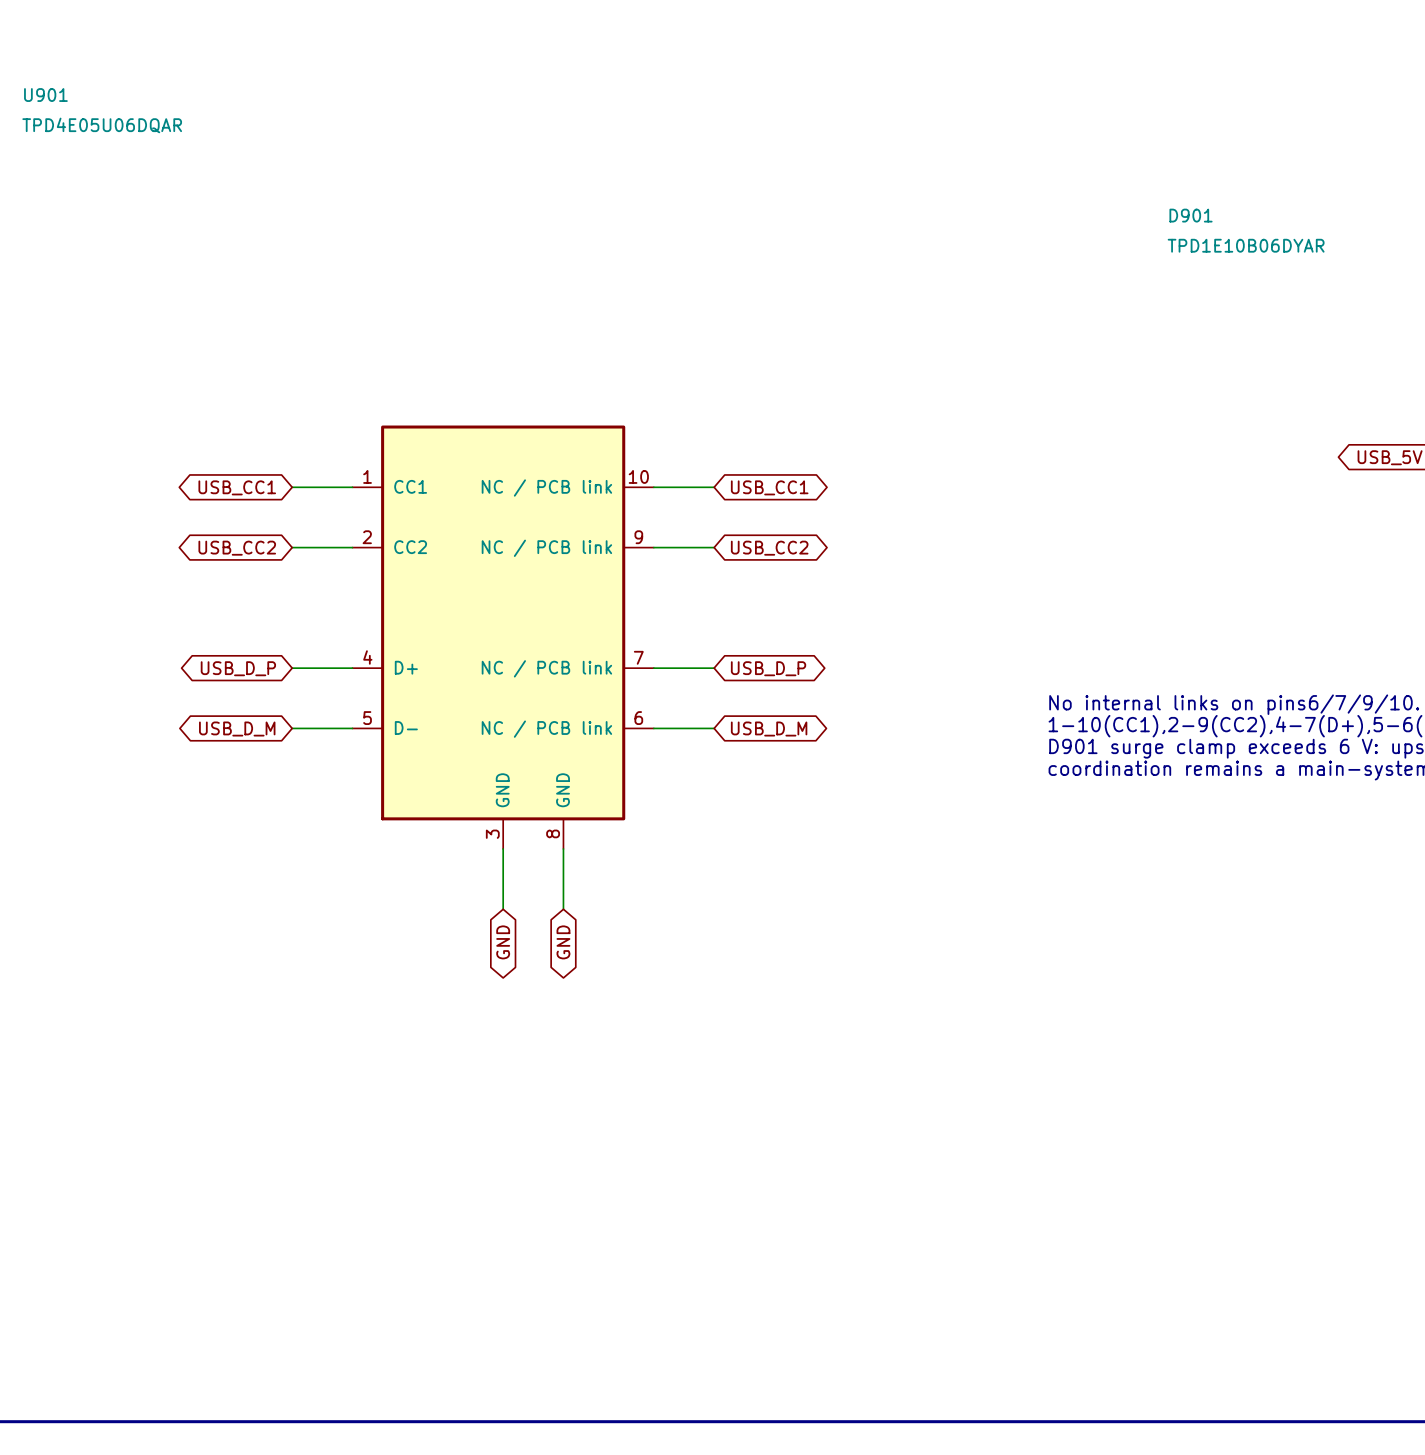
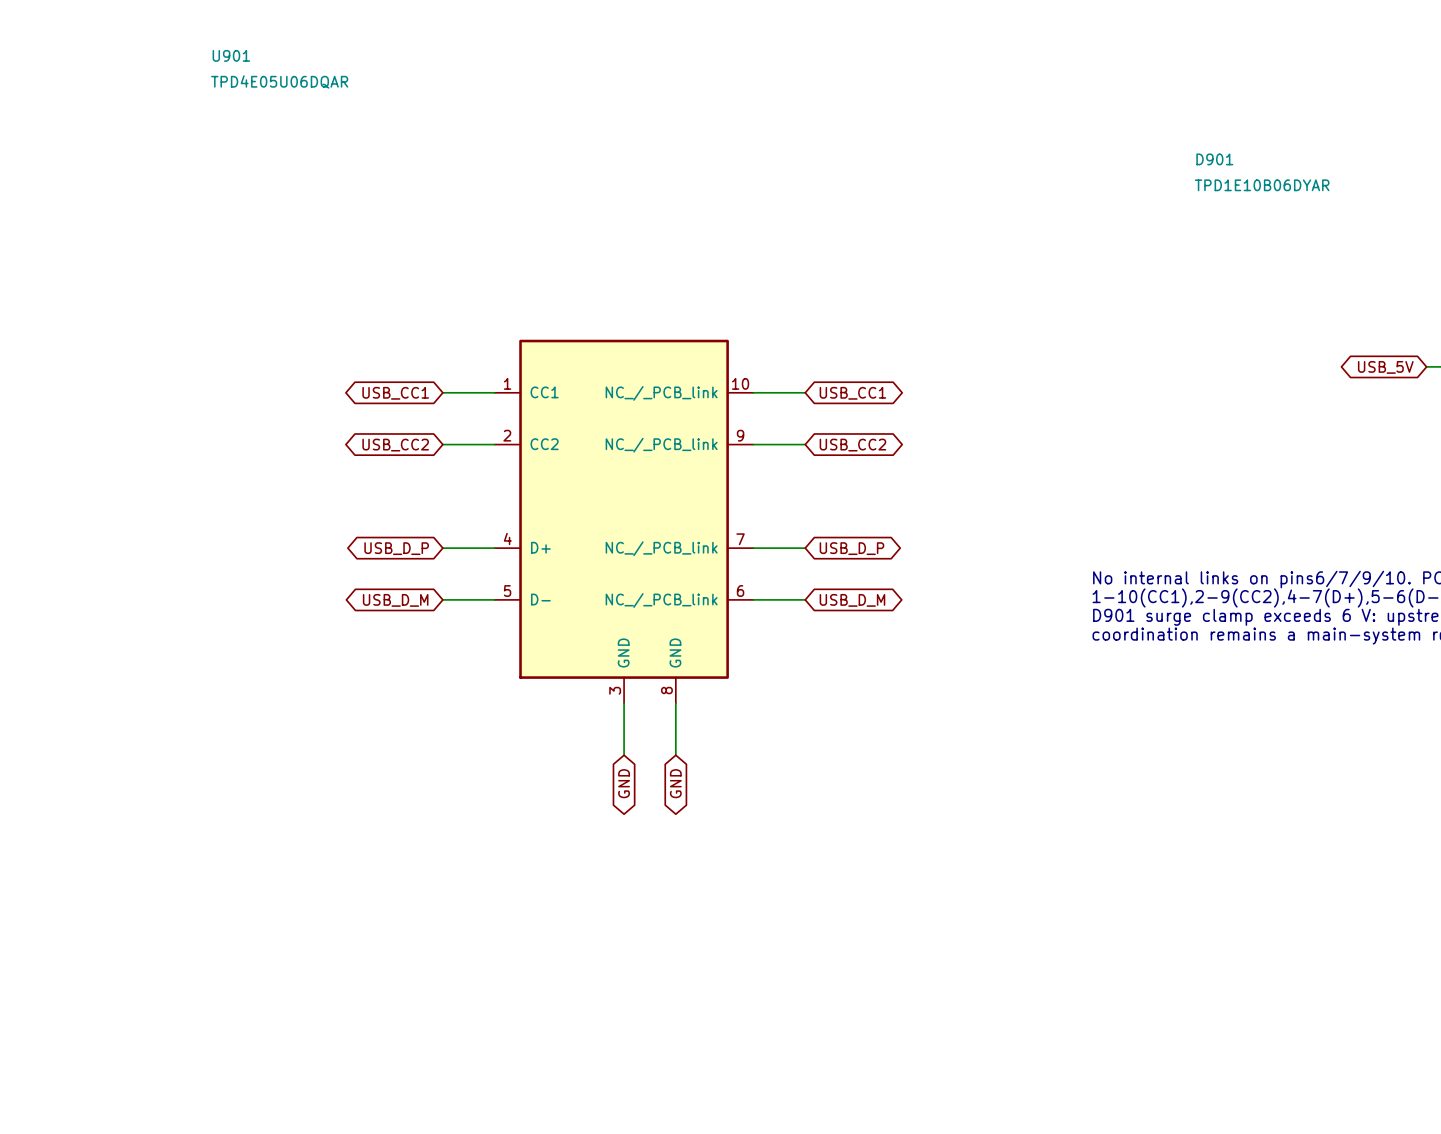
U901 pin name: NC / PCB link (546, 488) -> NC_/_PCB_link (661, 393)
U901 pin name: NC / PCB link (546, 548) -> NC_/_PCB_link (661, 445)
U901 pin name: NC / PCB link (546, 668) -> NC_/_PCB_link (661, 548)
U901 pin name: NC / PCB link (546, 729) -> NC_/_PCB_link (661, 600)

